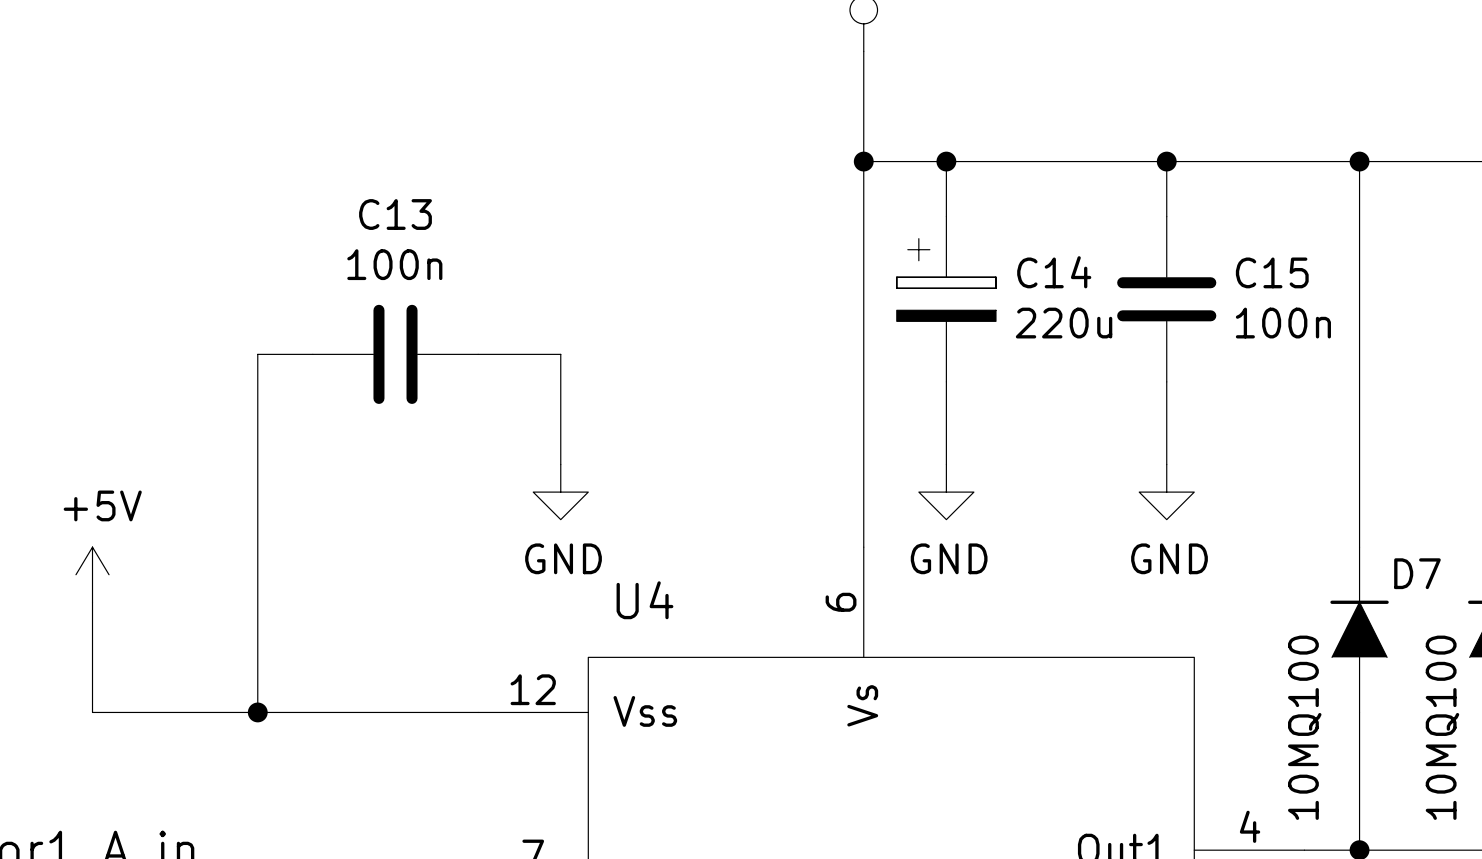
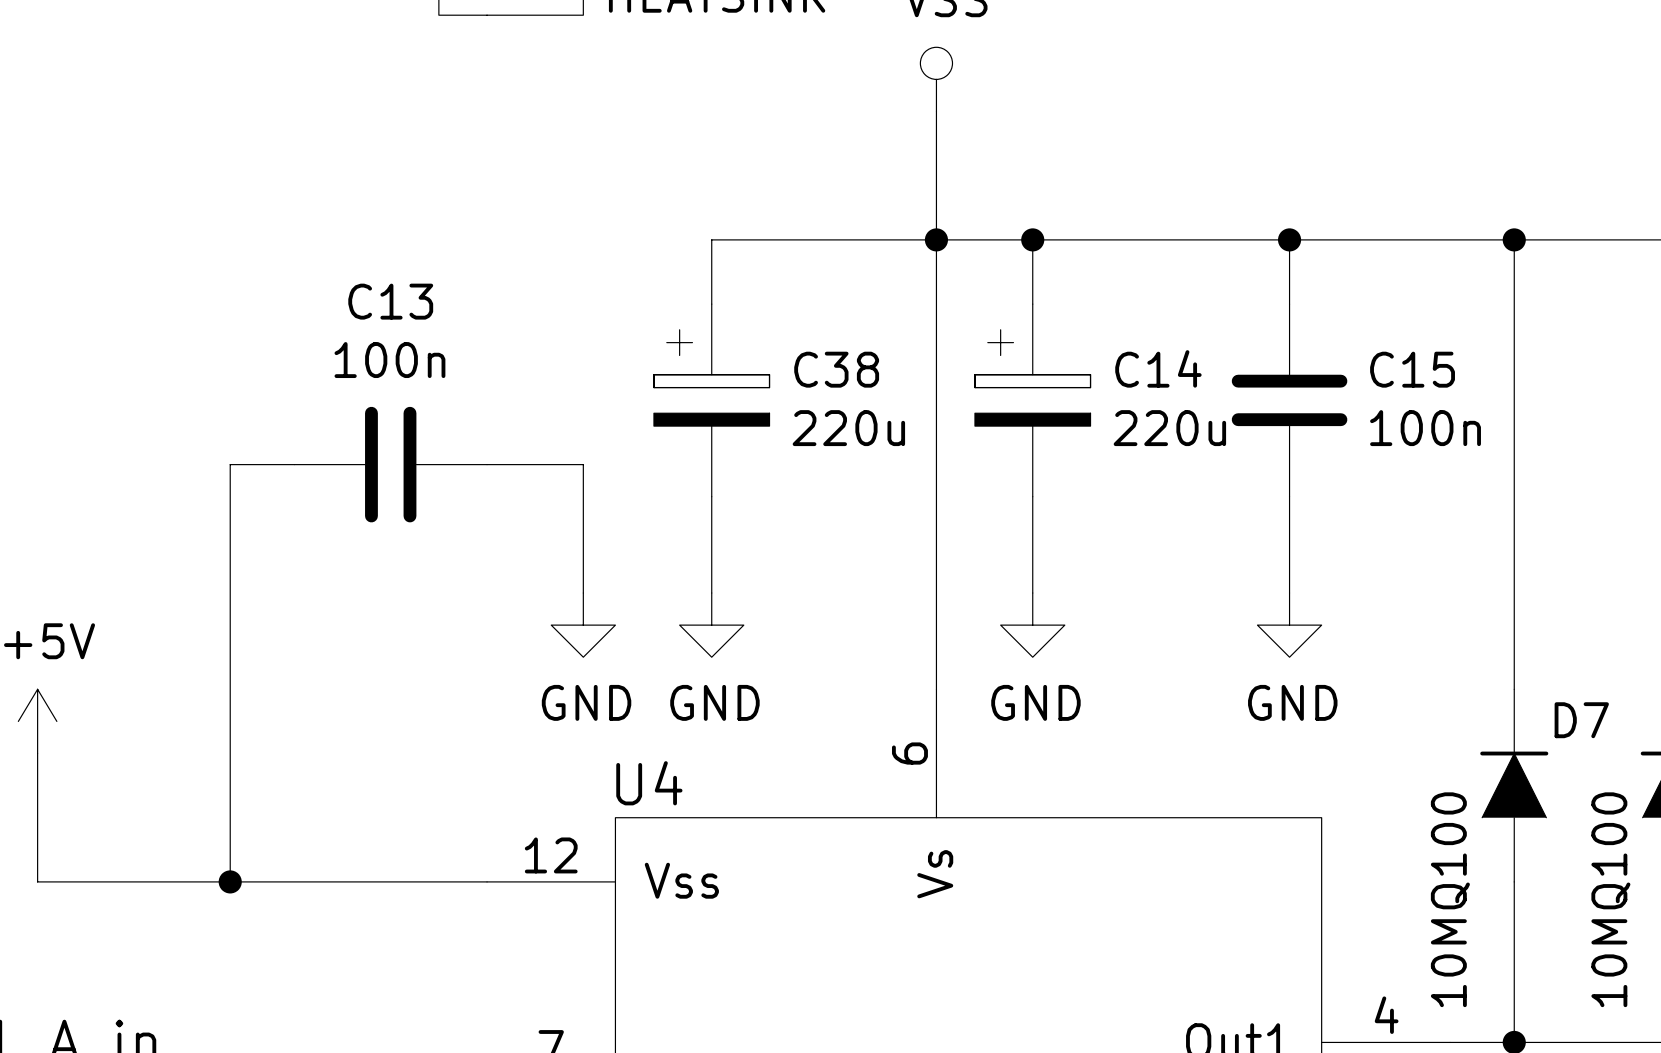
wire: none -> (936, 239) (711, 239) (711, 304)
C38: none -> 220u (711, 400)
wire: none -> (711, 496) (711, 593)
power symbol: none -> GND (711, 625)
U4 name position: U4 (644, 600) -> U4 (649, 783)

